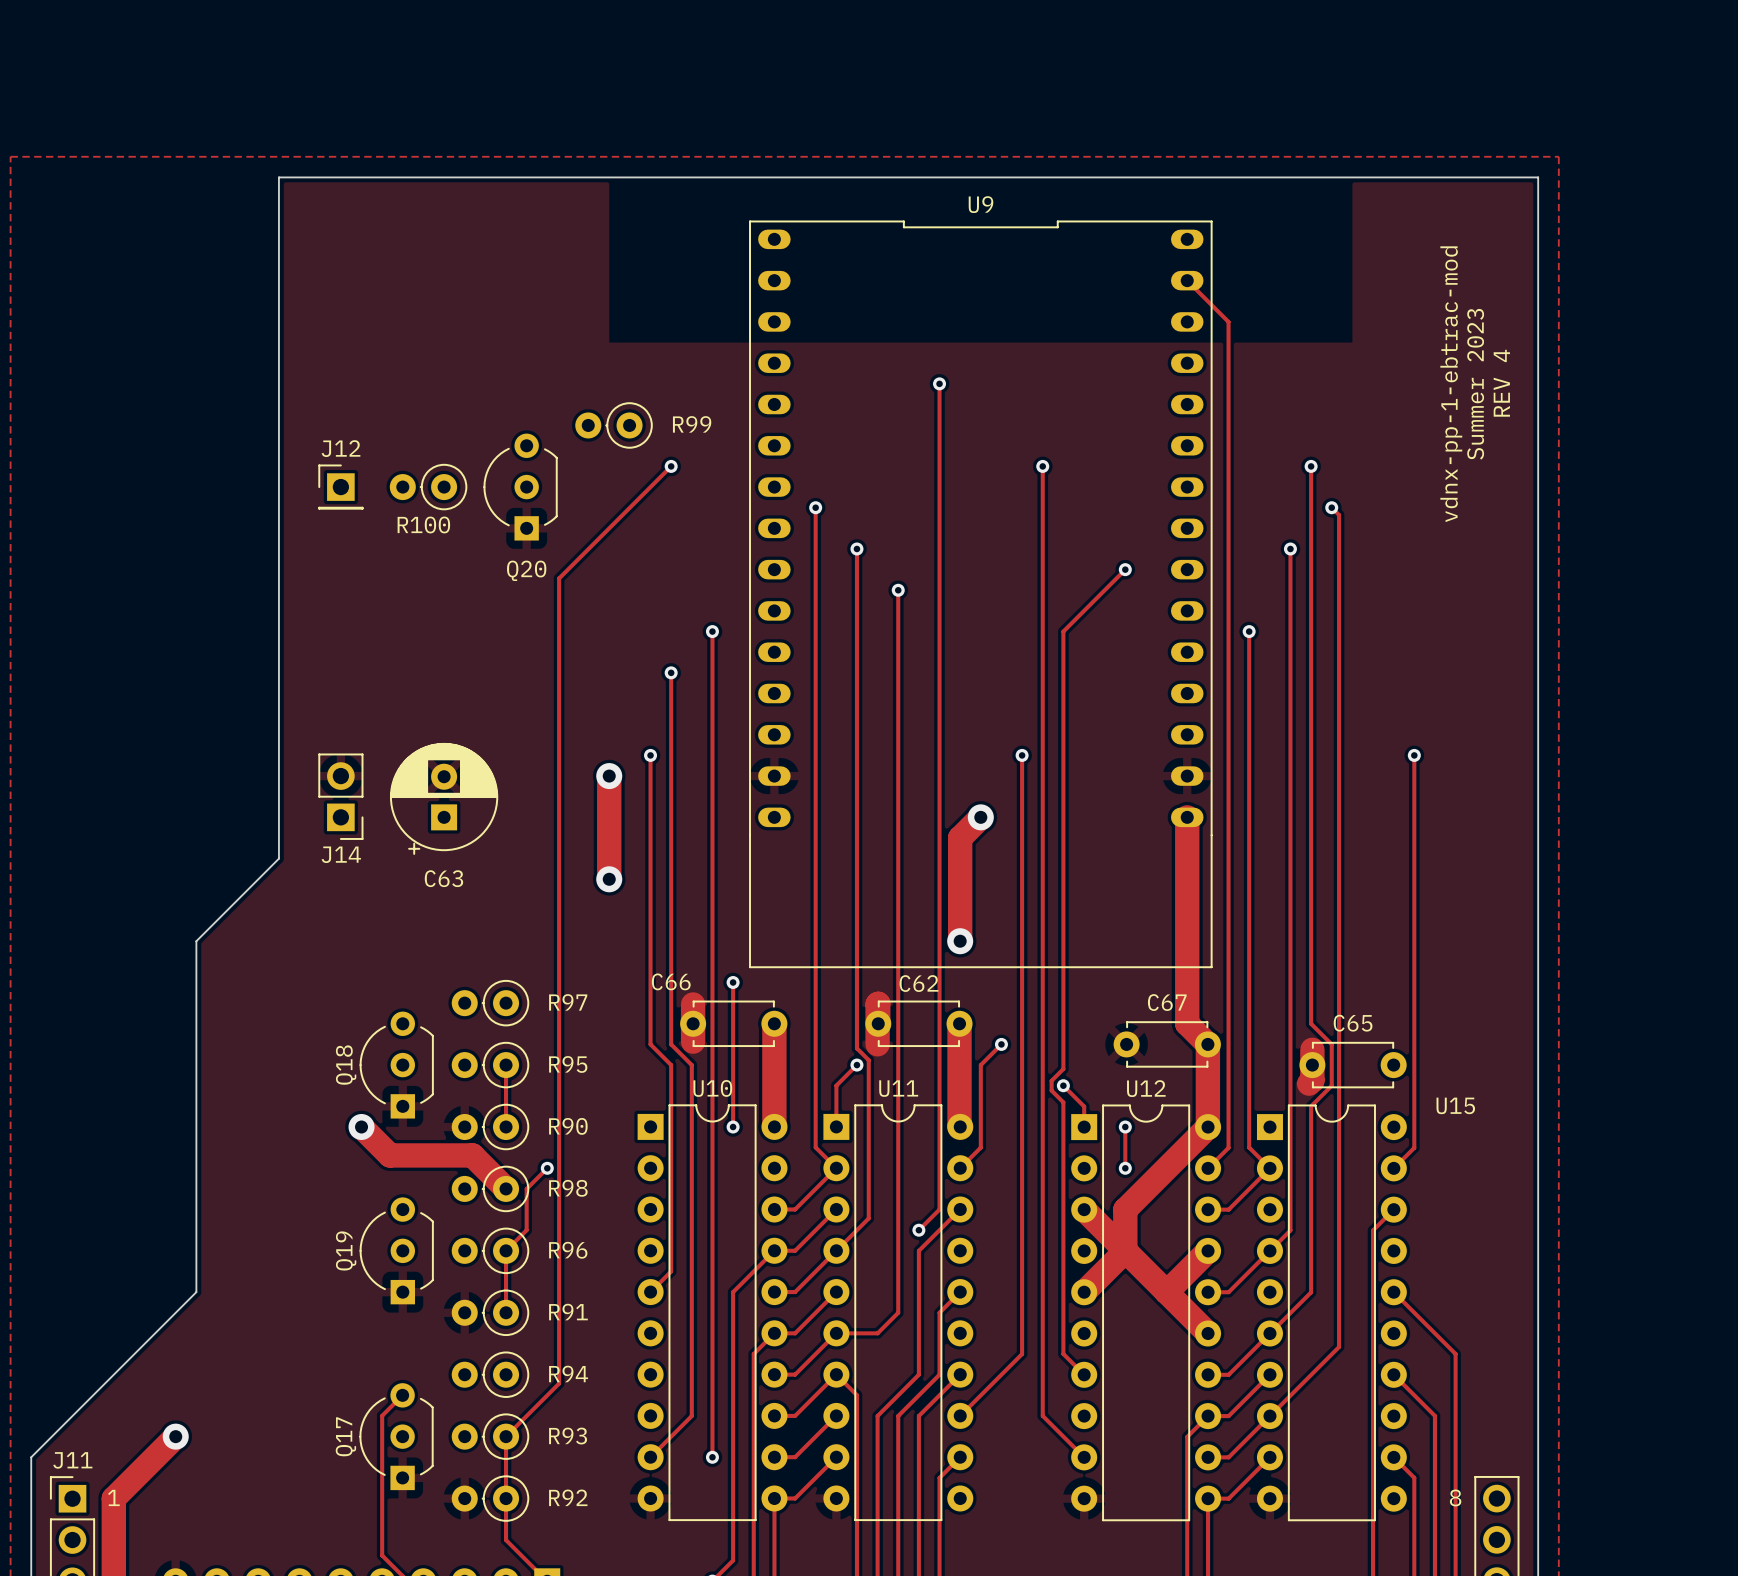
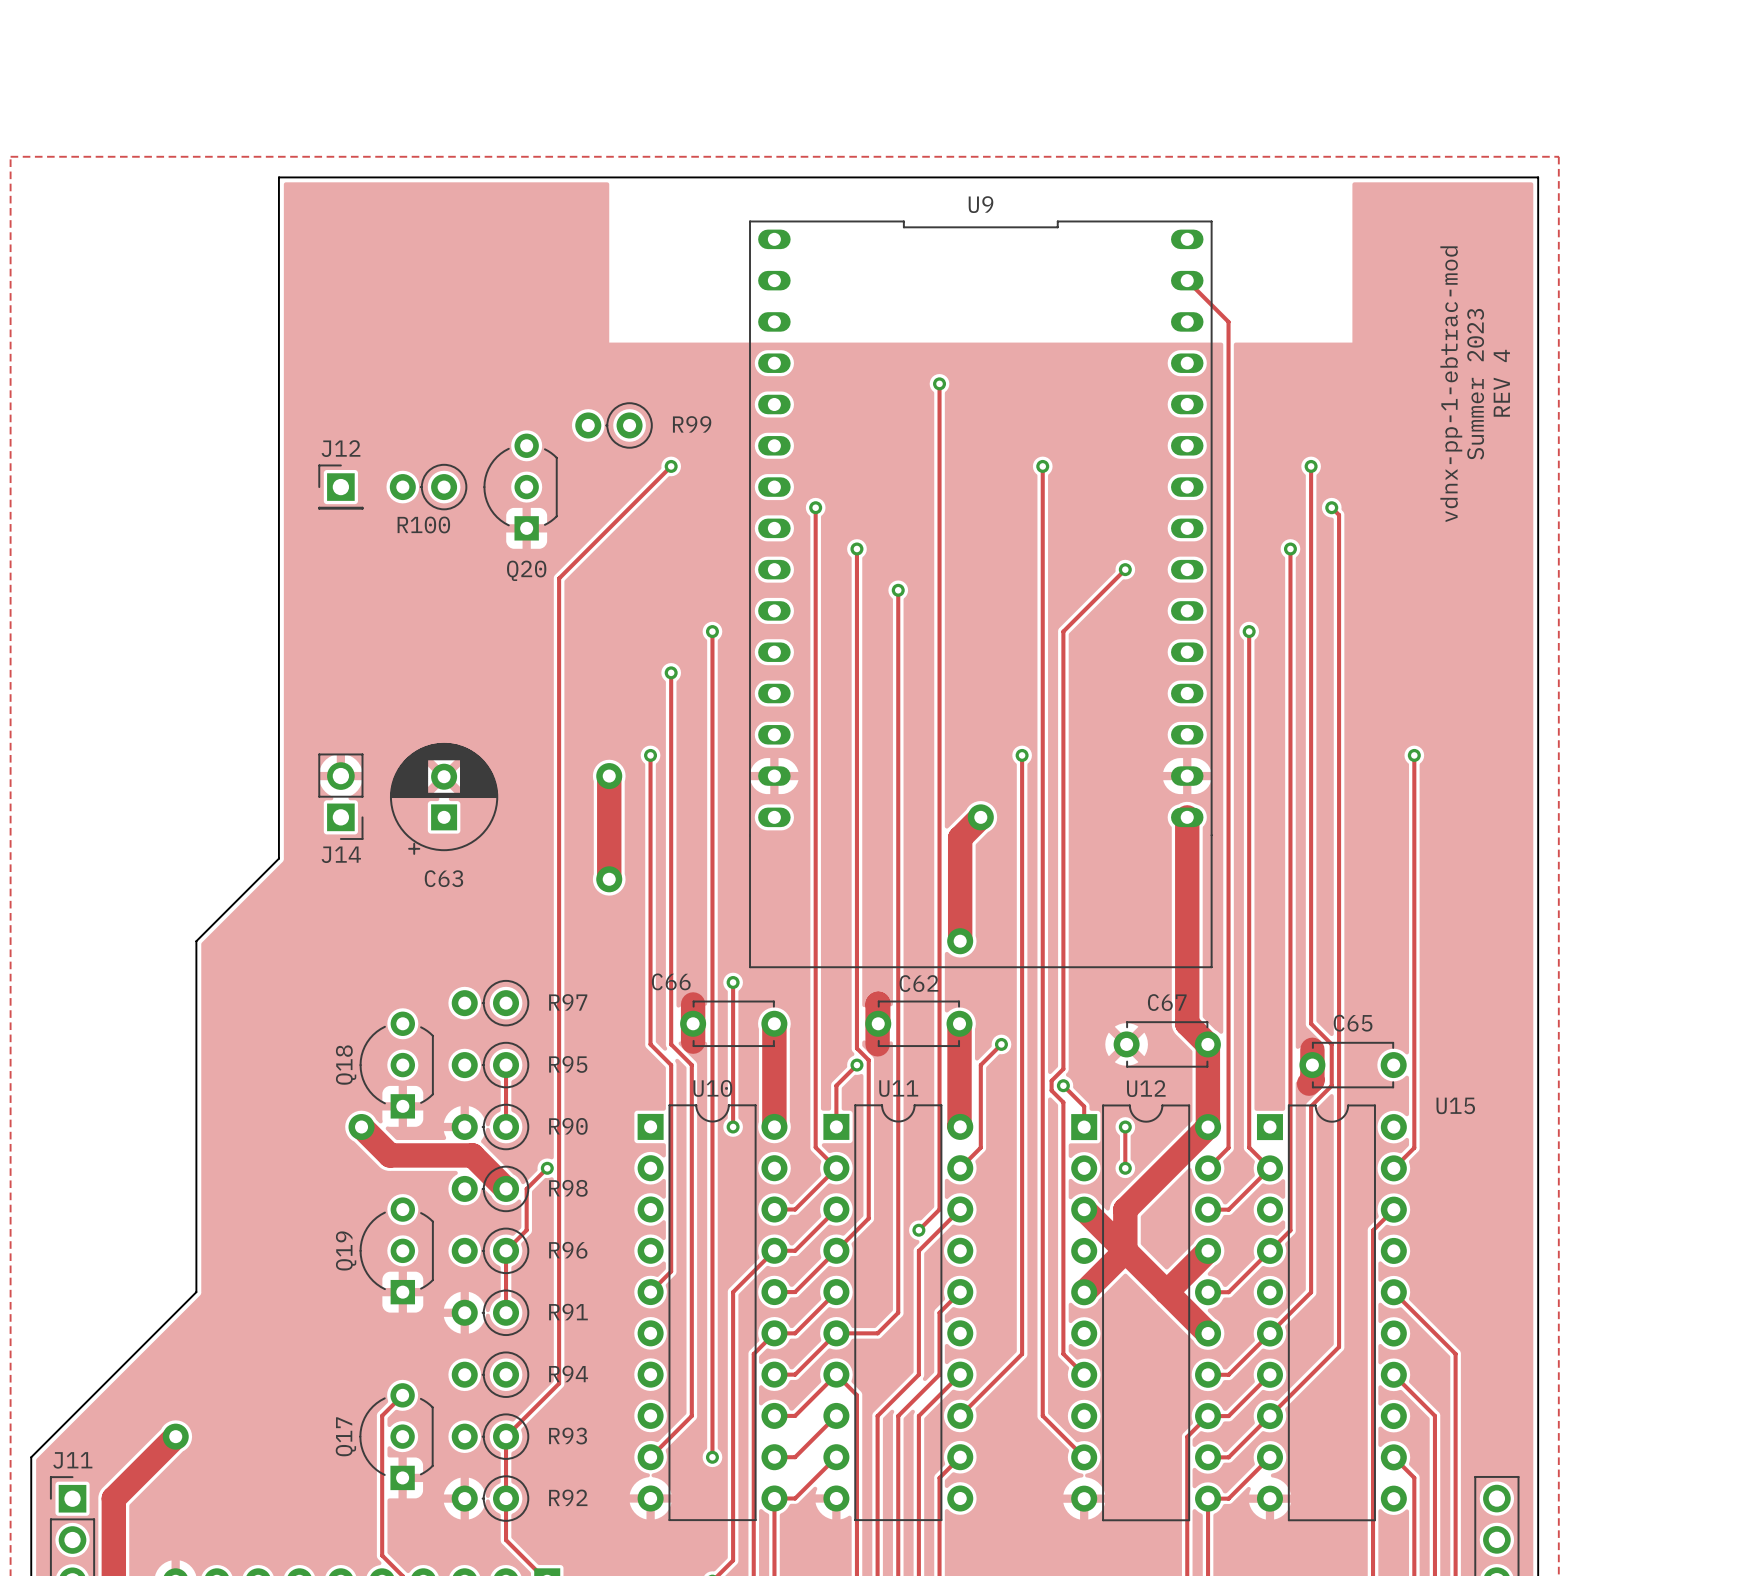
text: 1 (113, 1497) -> none
text: 8 (1455, 1497) -> none

